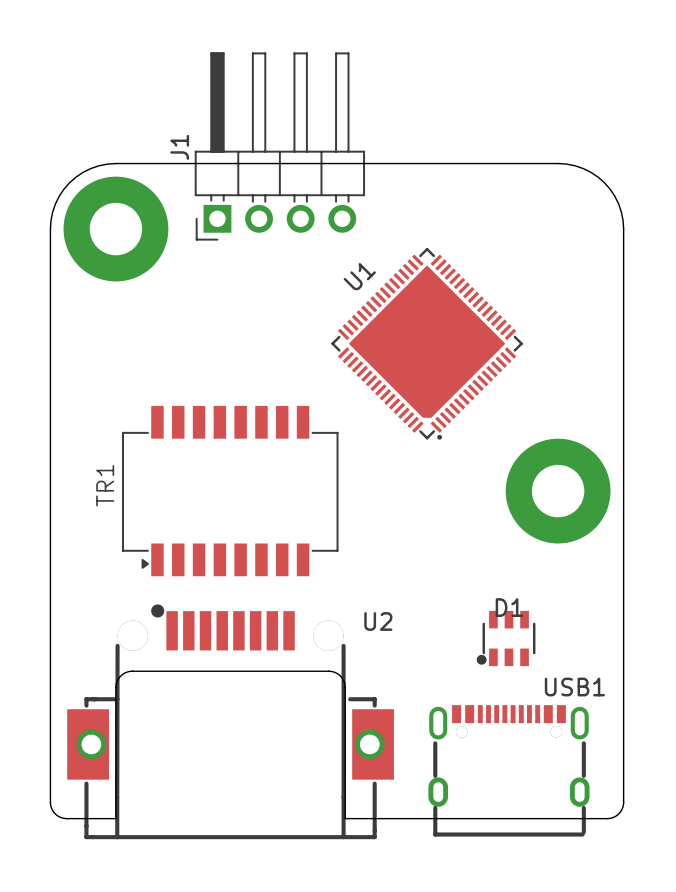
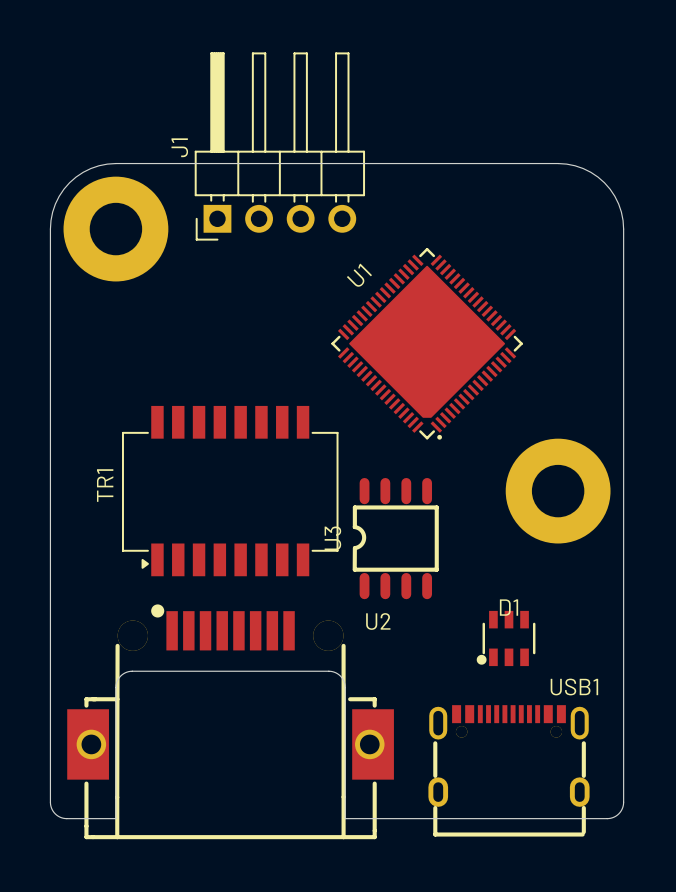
U3: none -> (394, 538)

